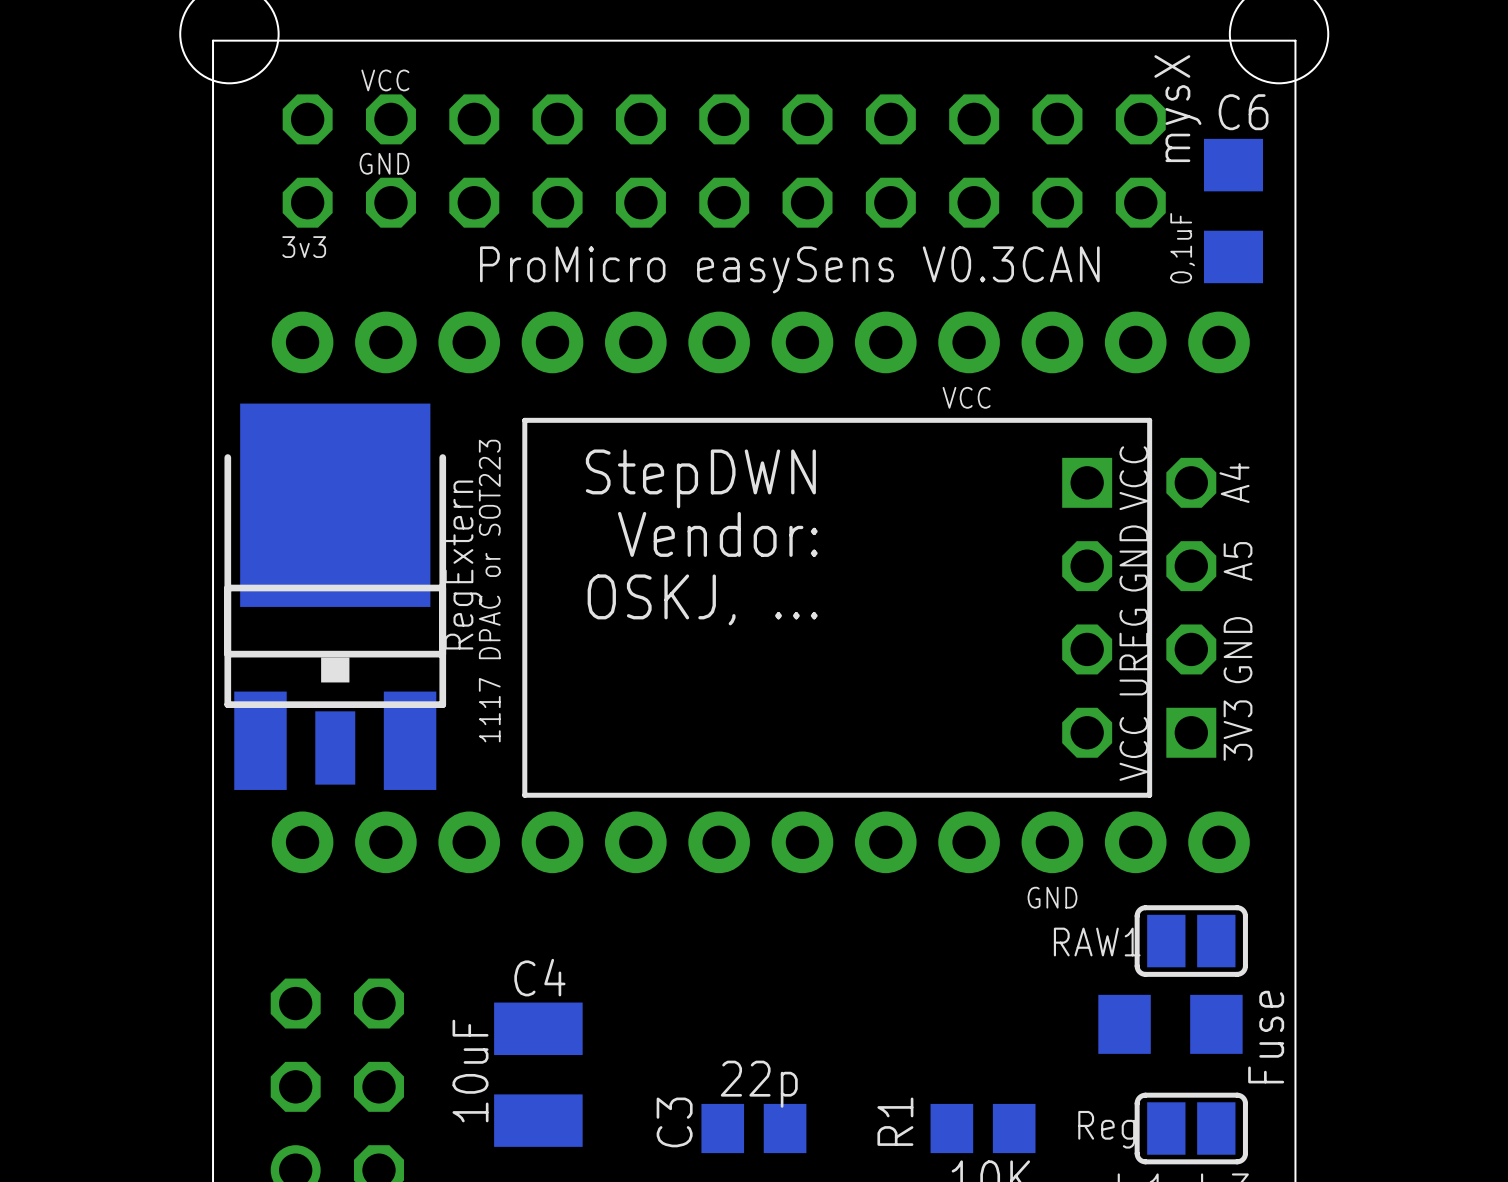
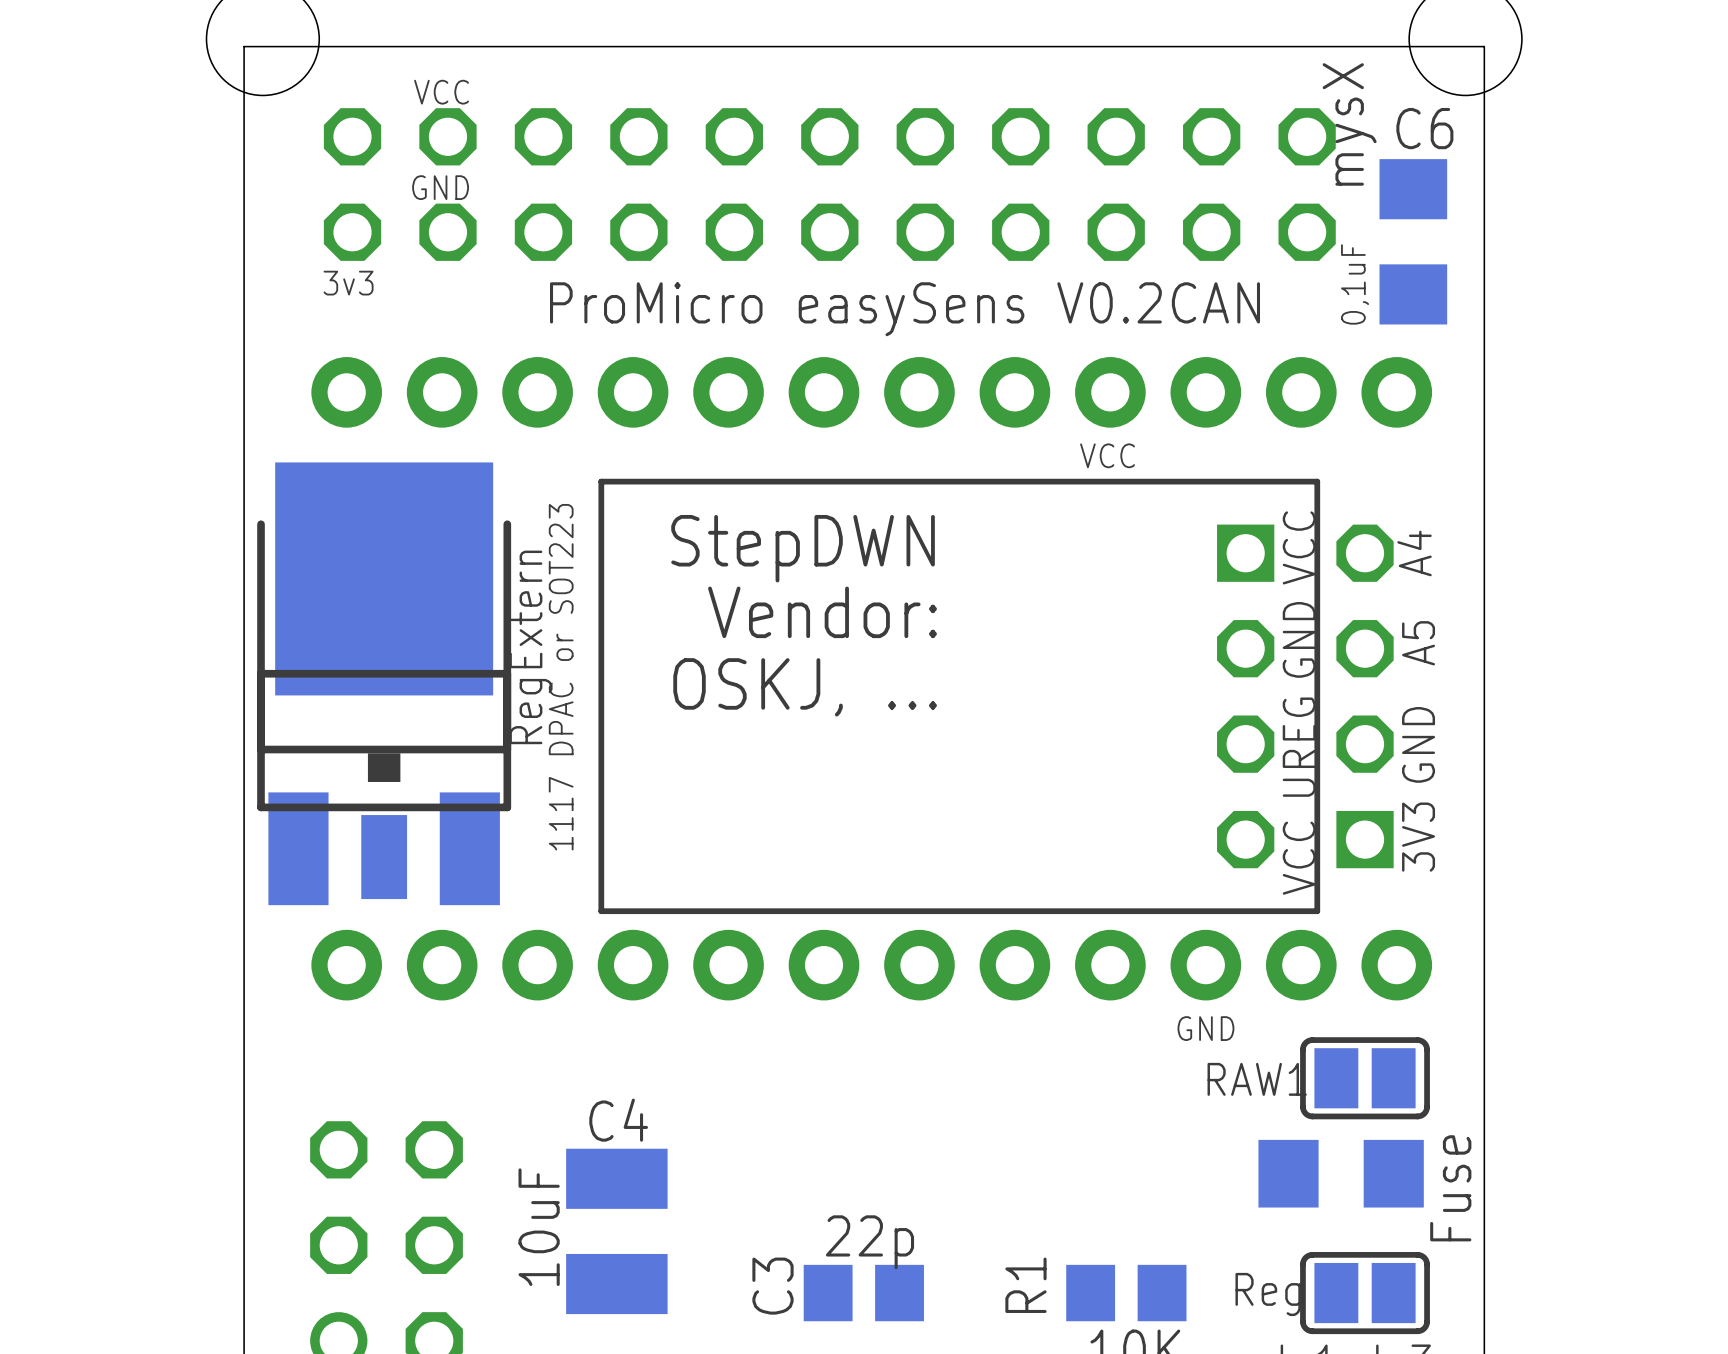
text: ProMicro easySens V0.3CAN (789, 269) -> ProMicro easySens V0.2CAN (905, 309)

